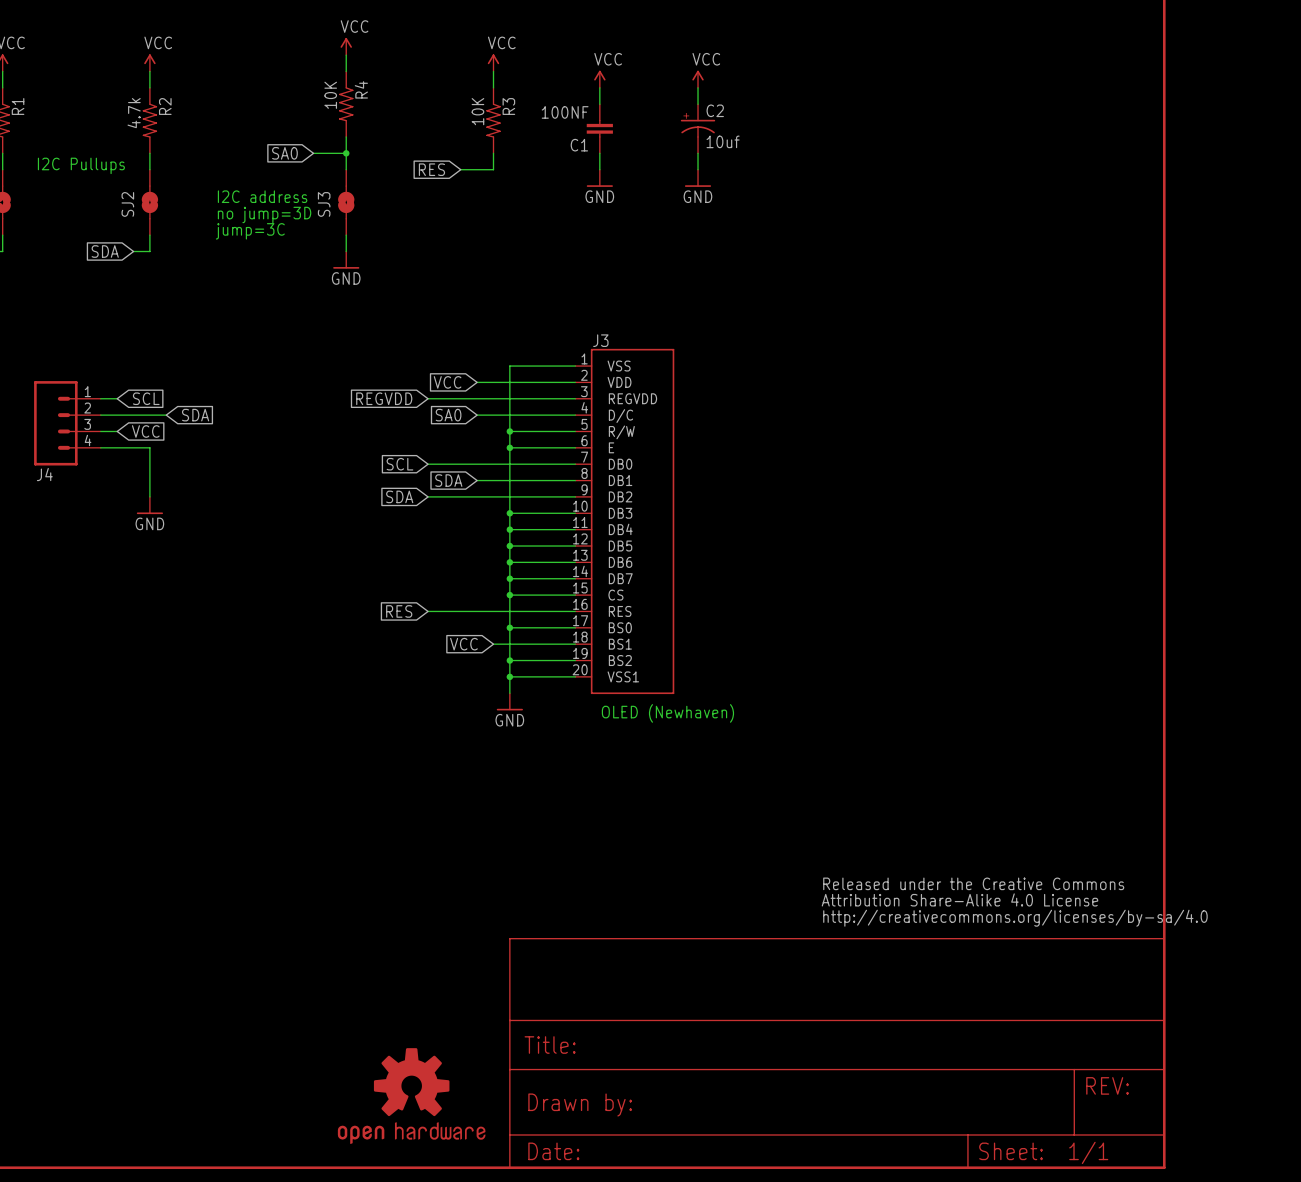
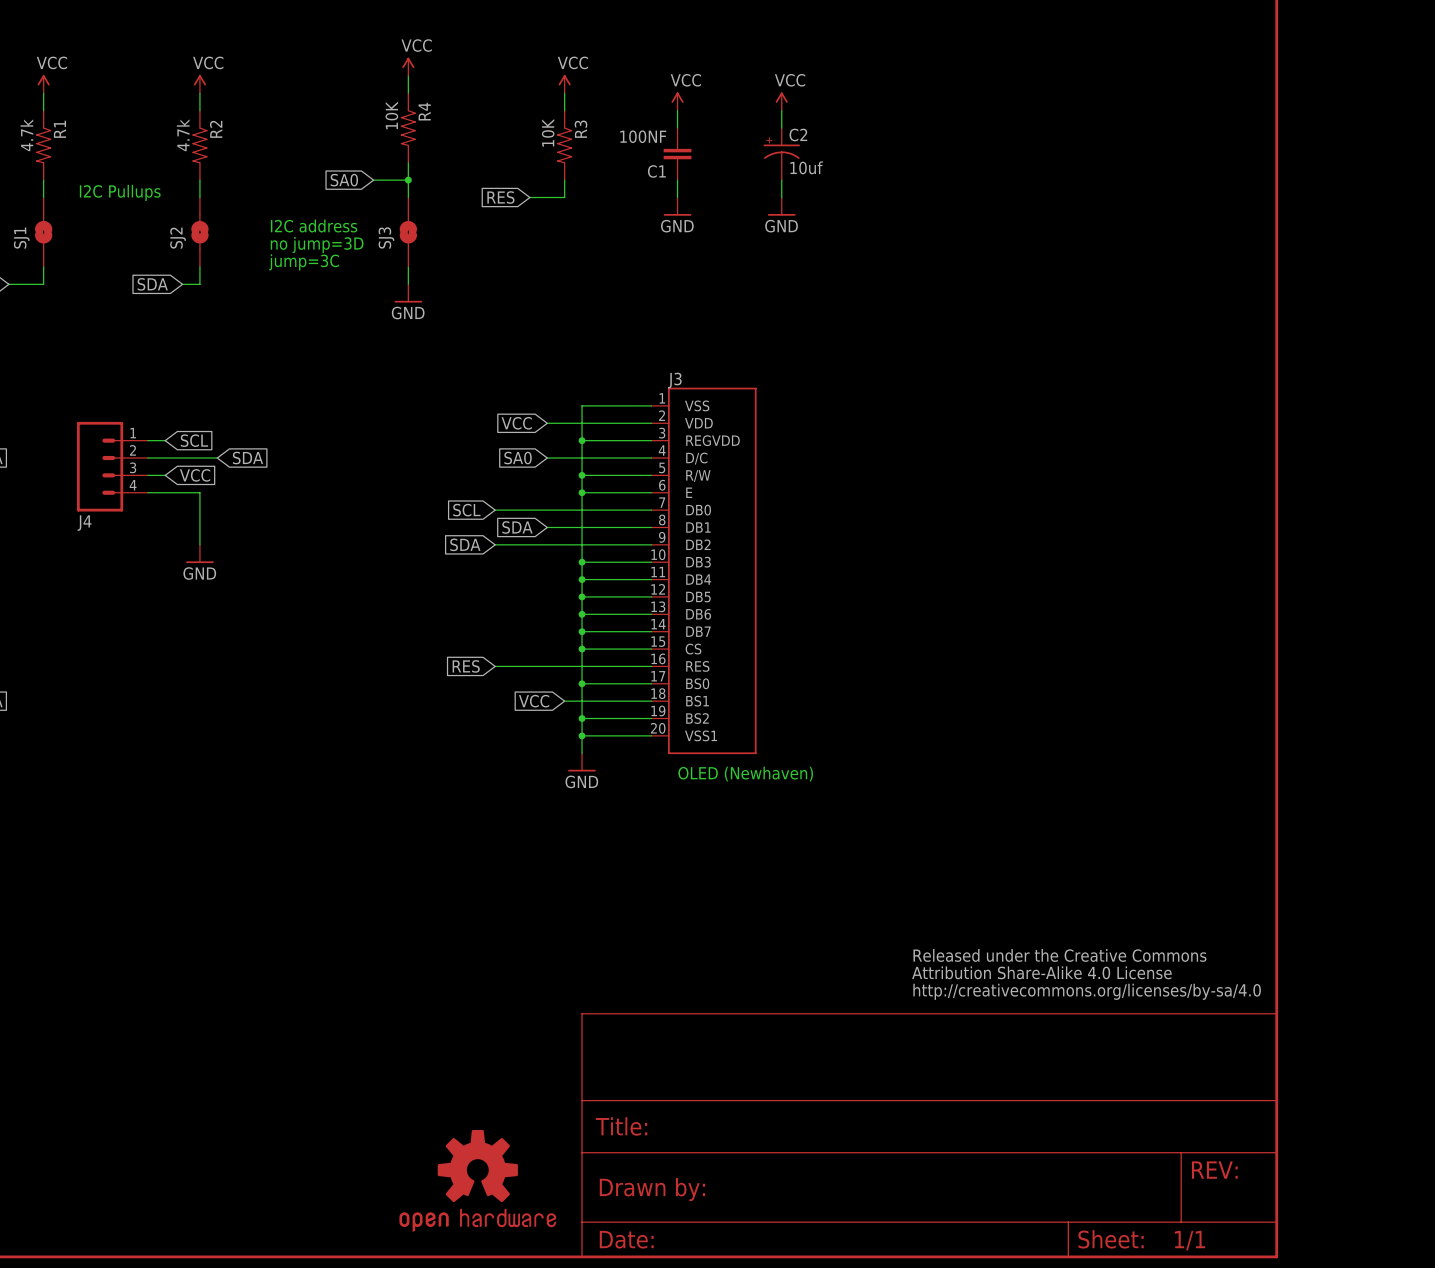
global label: REGVDD (384, 398) -> none
wire: (428, 398) (509, 398) -> none
junction: none -> (582, 440)

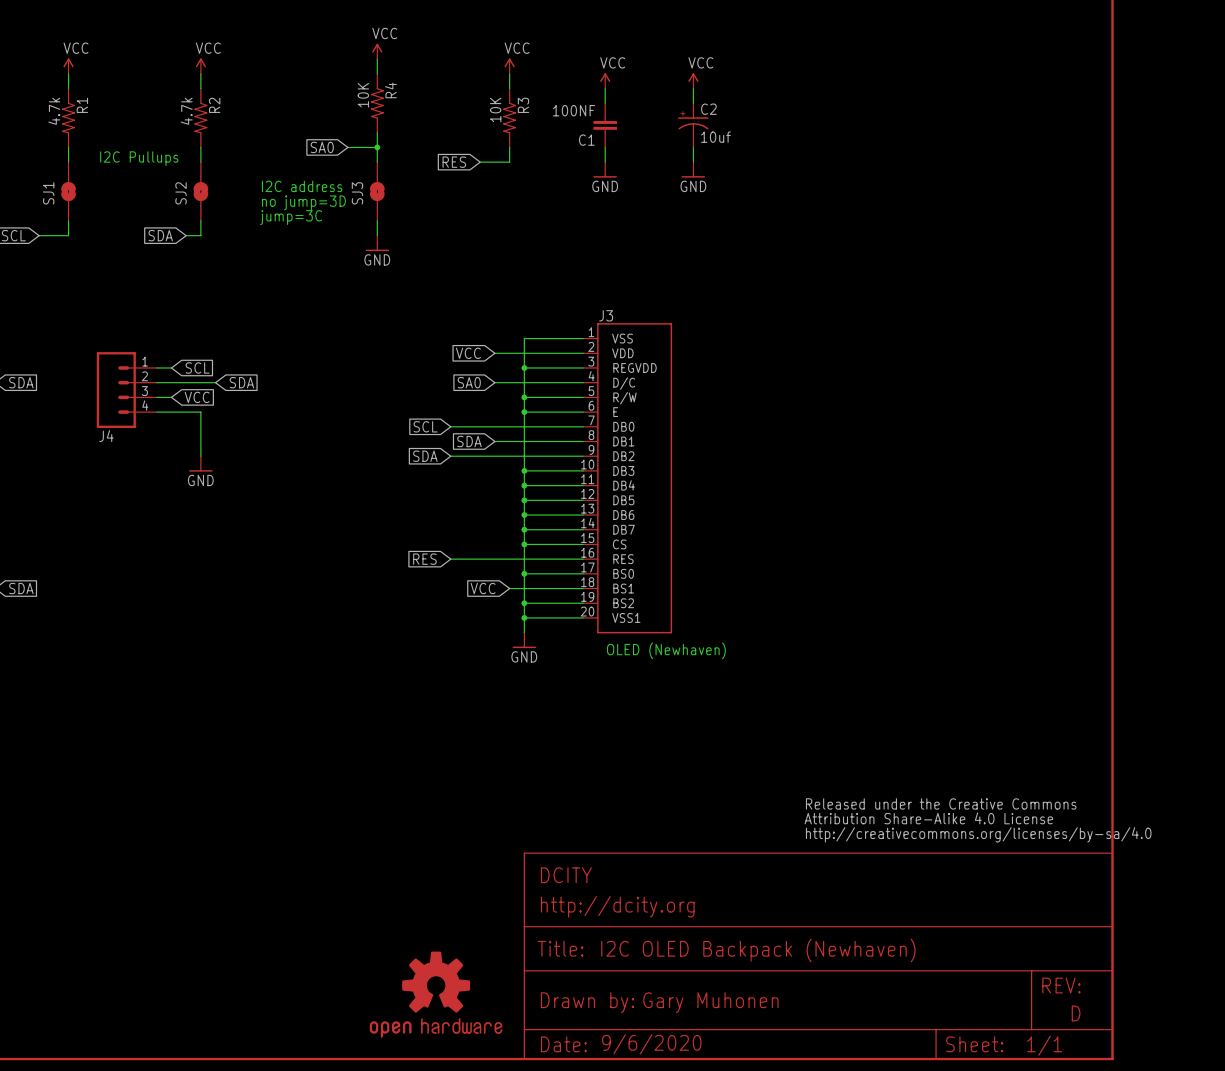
part text: none -> DCITY (566, 875)
part text: none -> http://dcity.org (617, 906)
part text: none -> I2C OLED Backpack (Newhaven) (758, 950)
part text: none -> Gary Muhonen (710, 1002)
part text: none -> D (1076, 1013)
part text: none -> 9/6/2020 (651, 1044)

